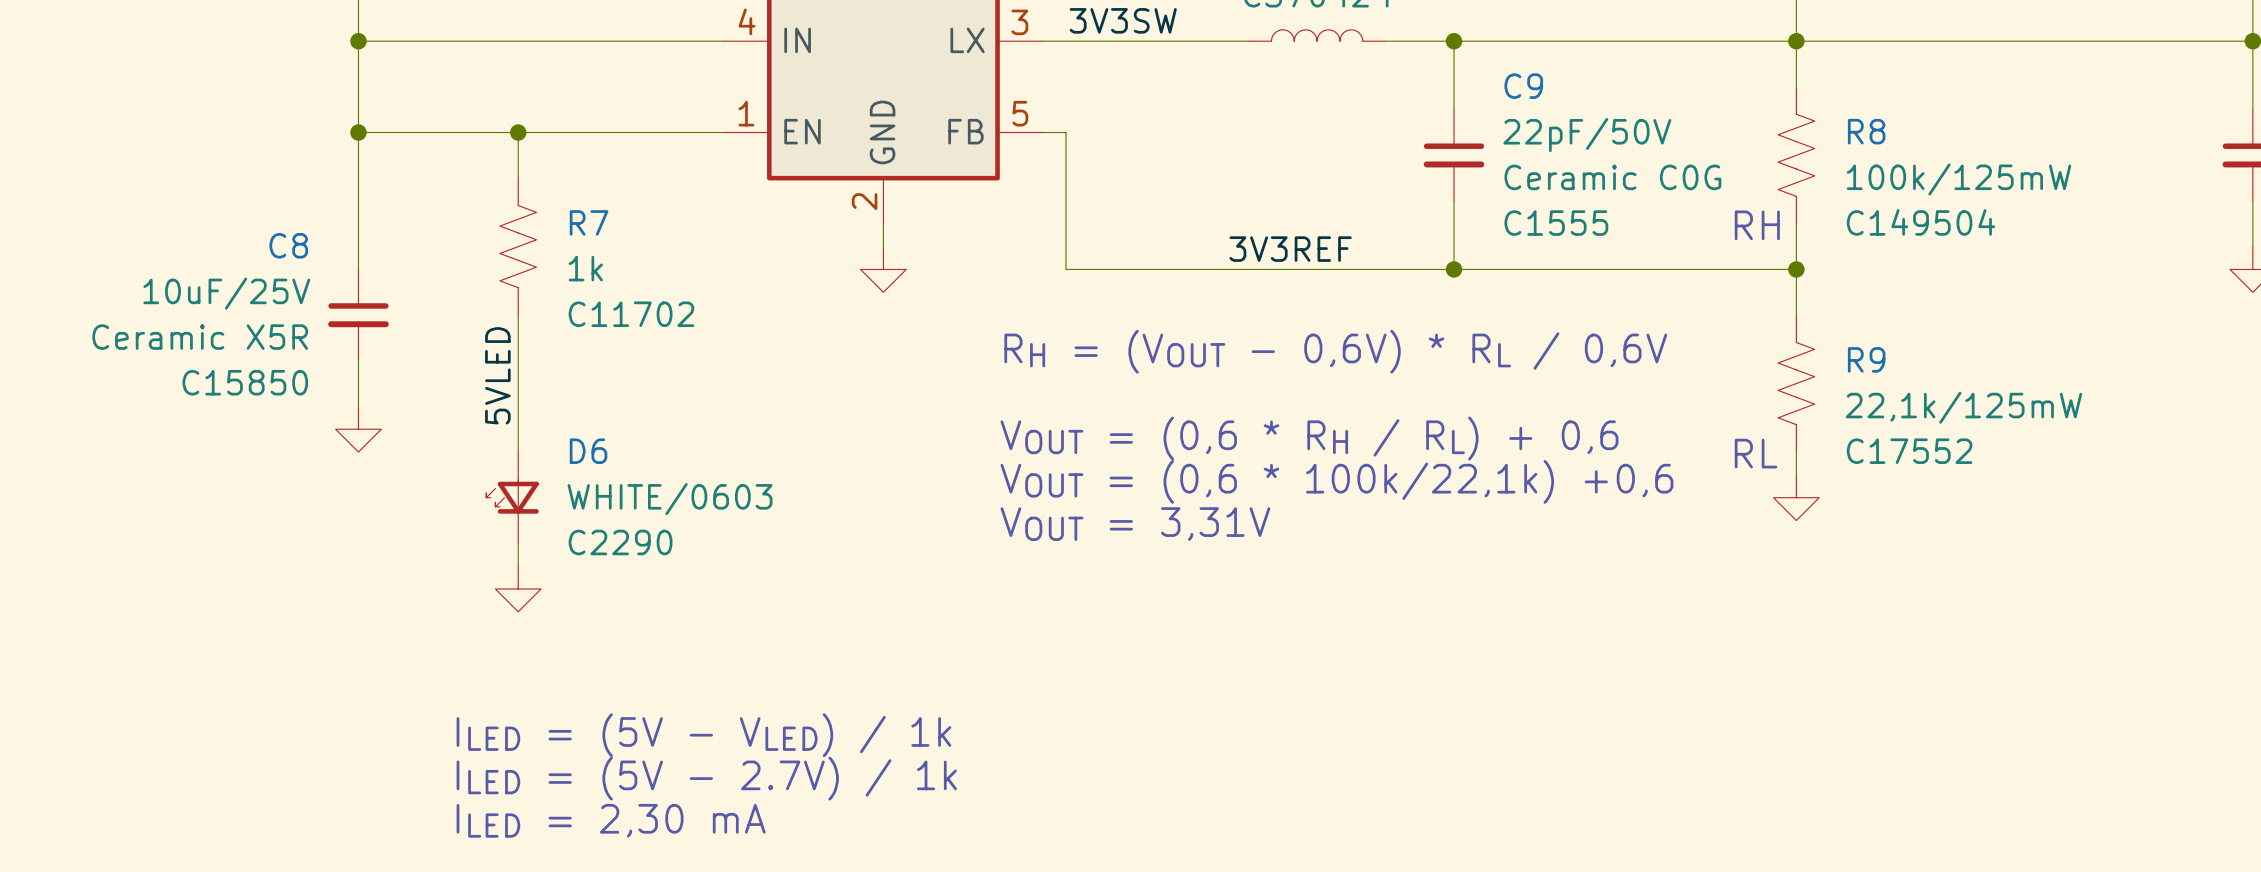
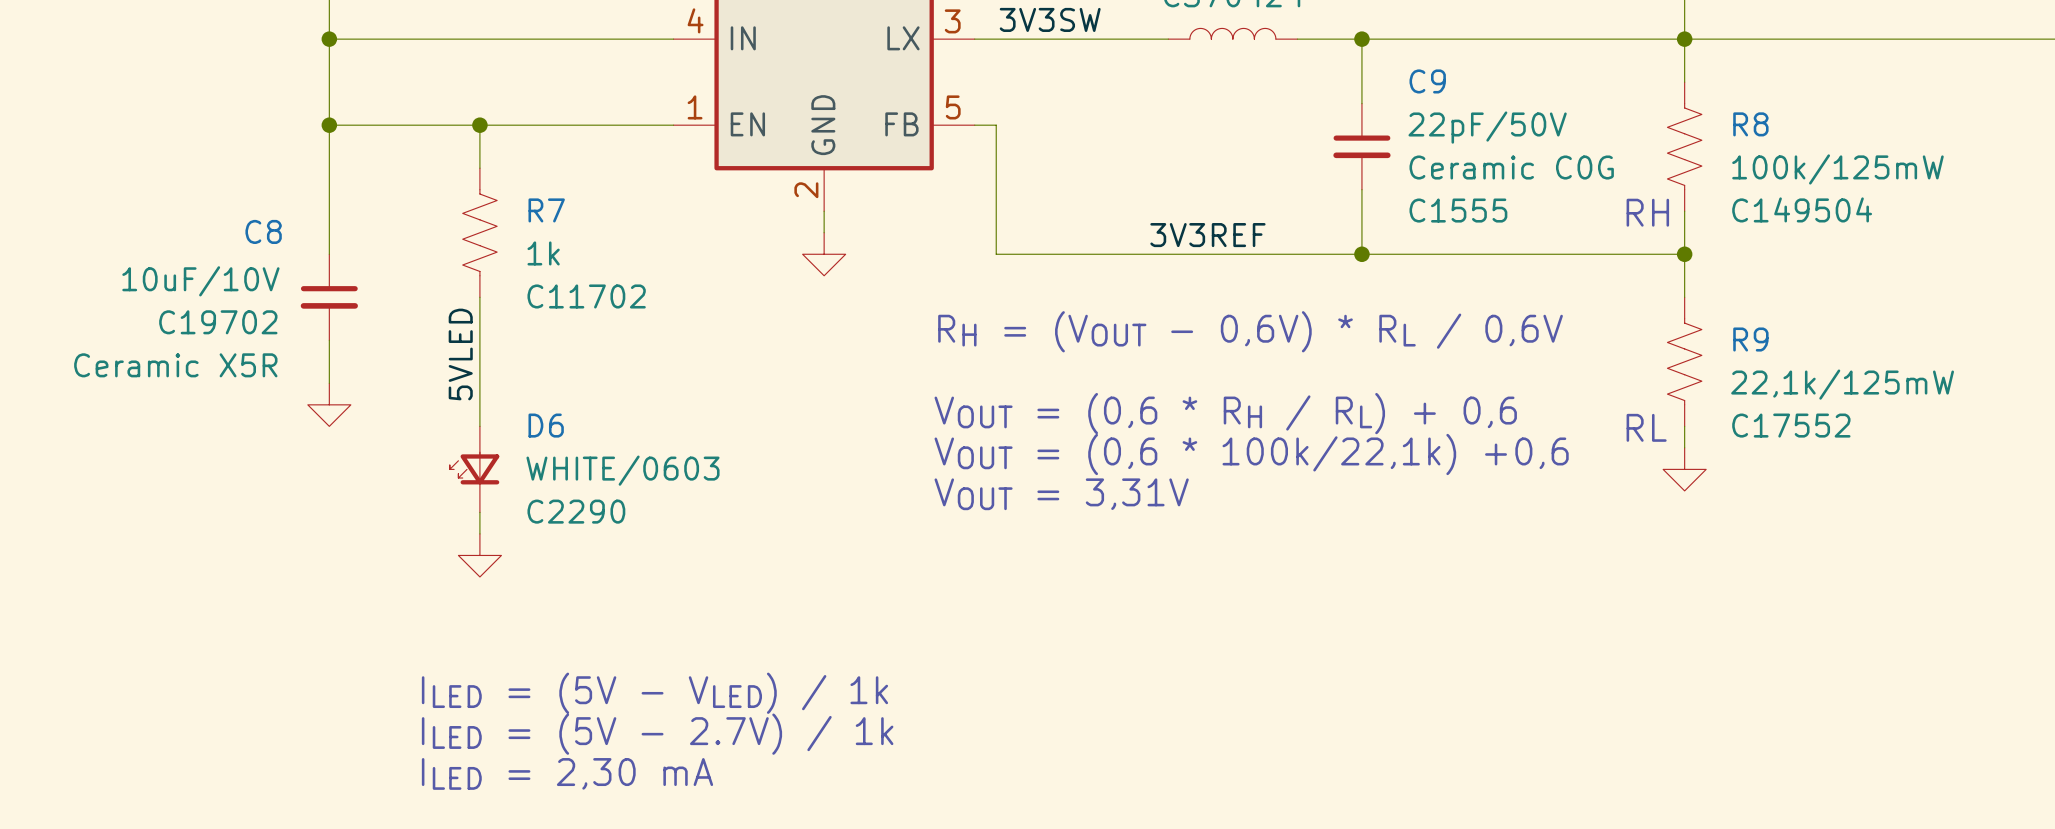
C8 value: 10uF/25V (226, 293) -> 10uF/10V (200, 281)
C8 text position: Ceramic X5R (200, 337) -> Ceramic X5R (175, 365)
C8 text: C15850 (245, 382) -> C19702 (218, 322)

